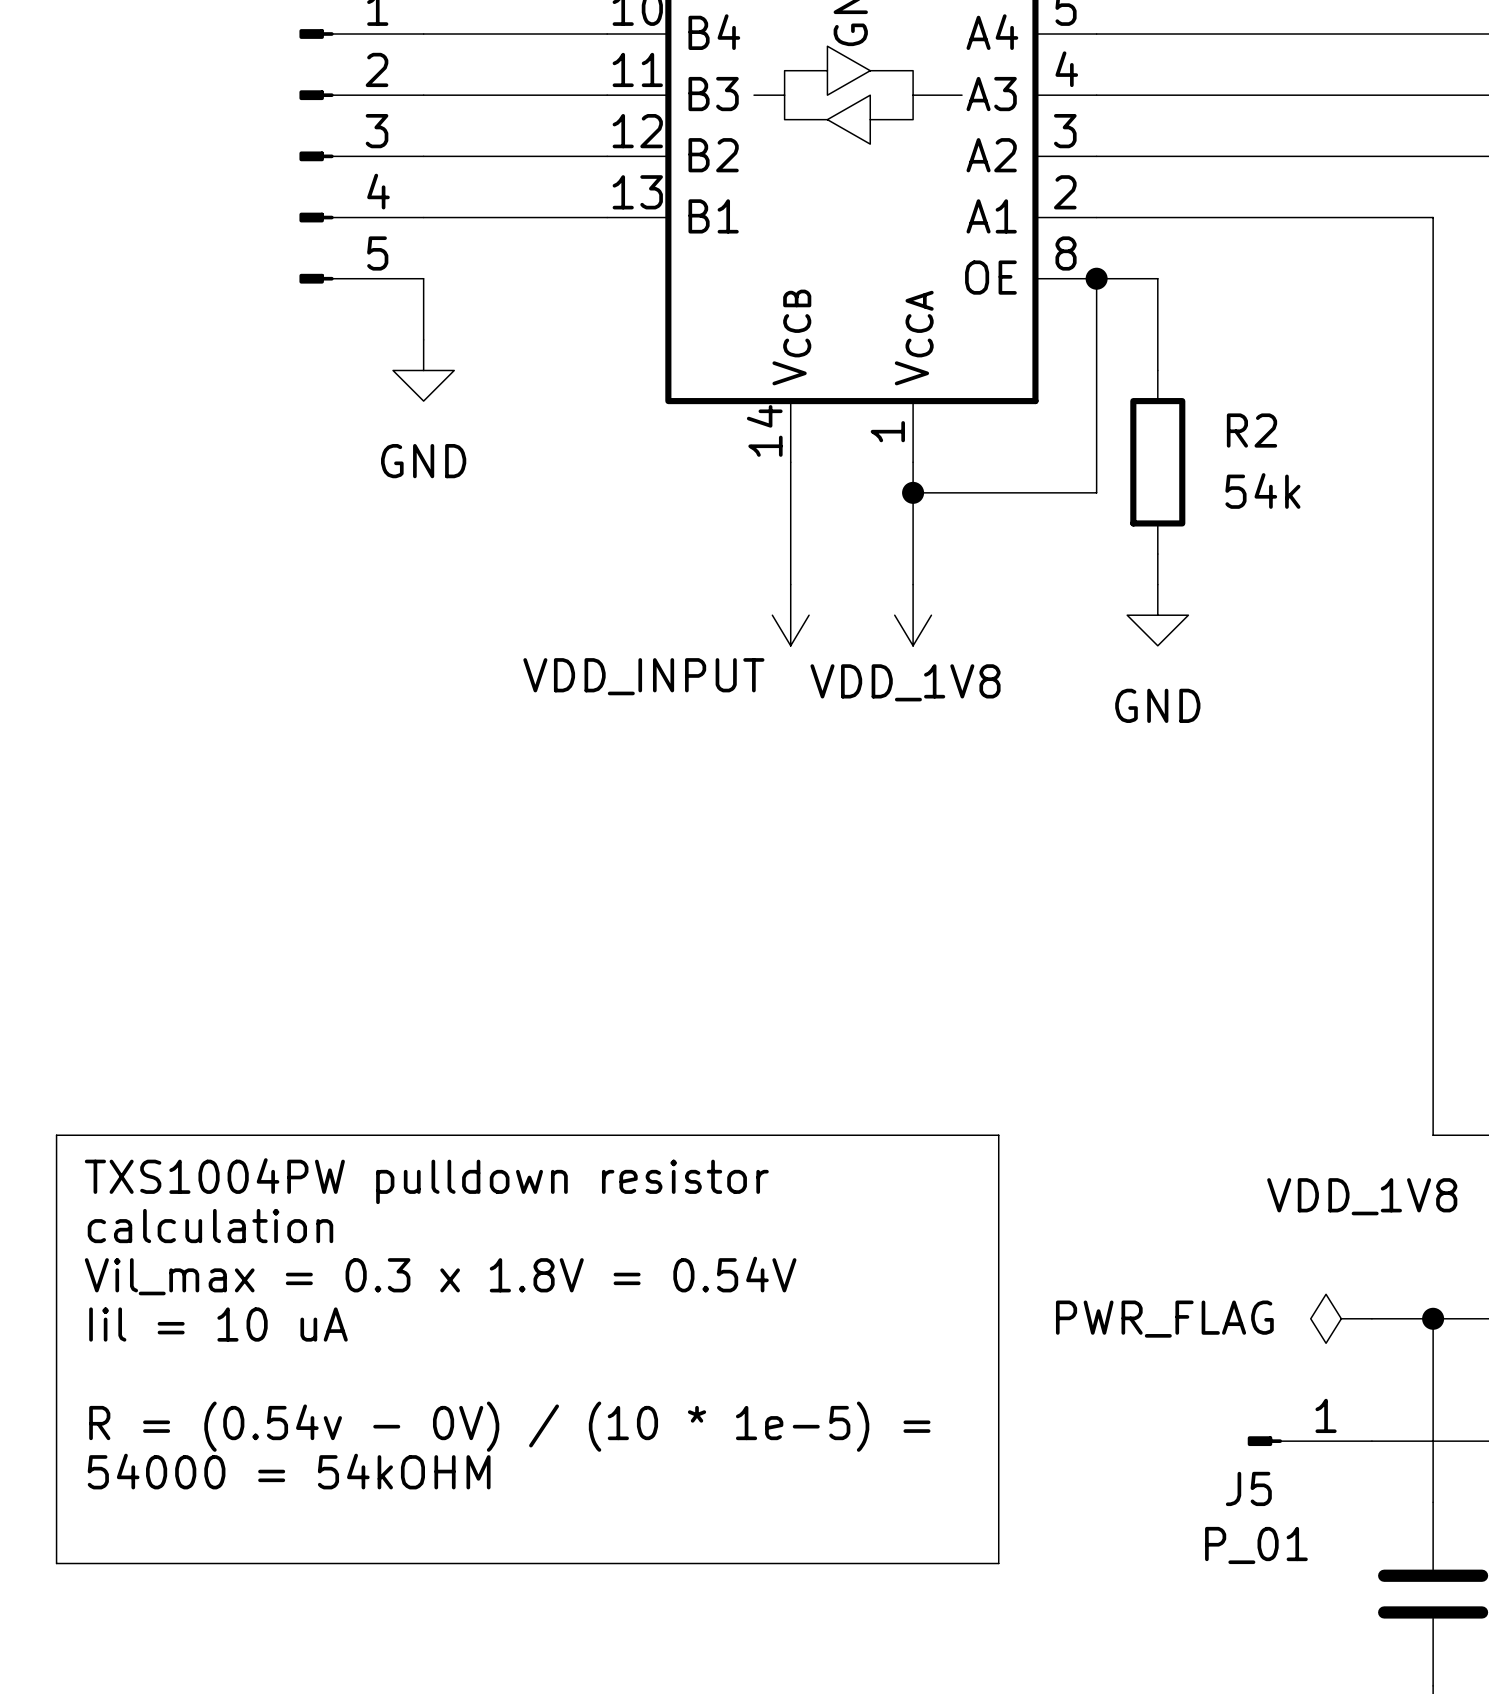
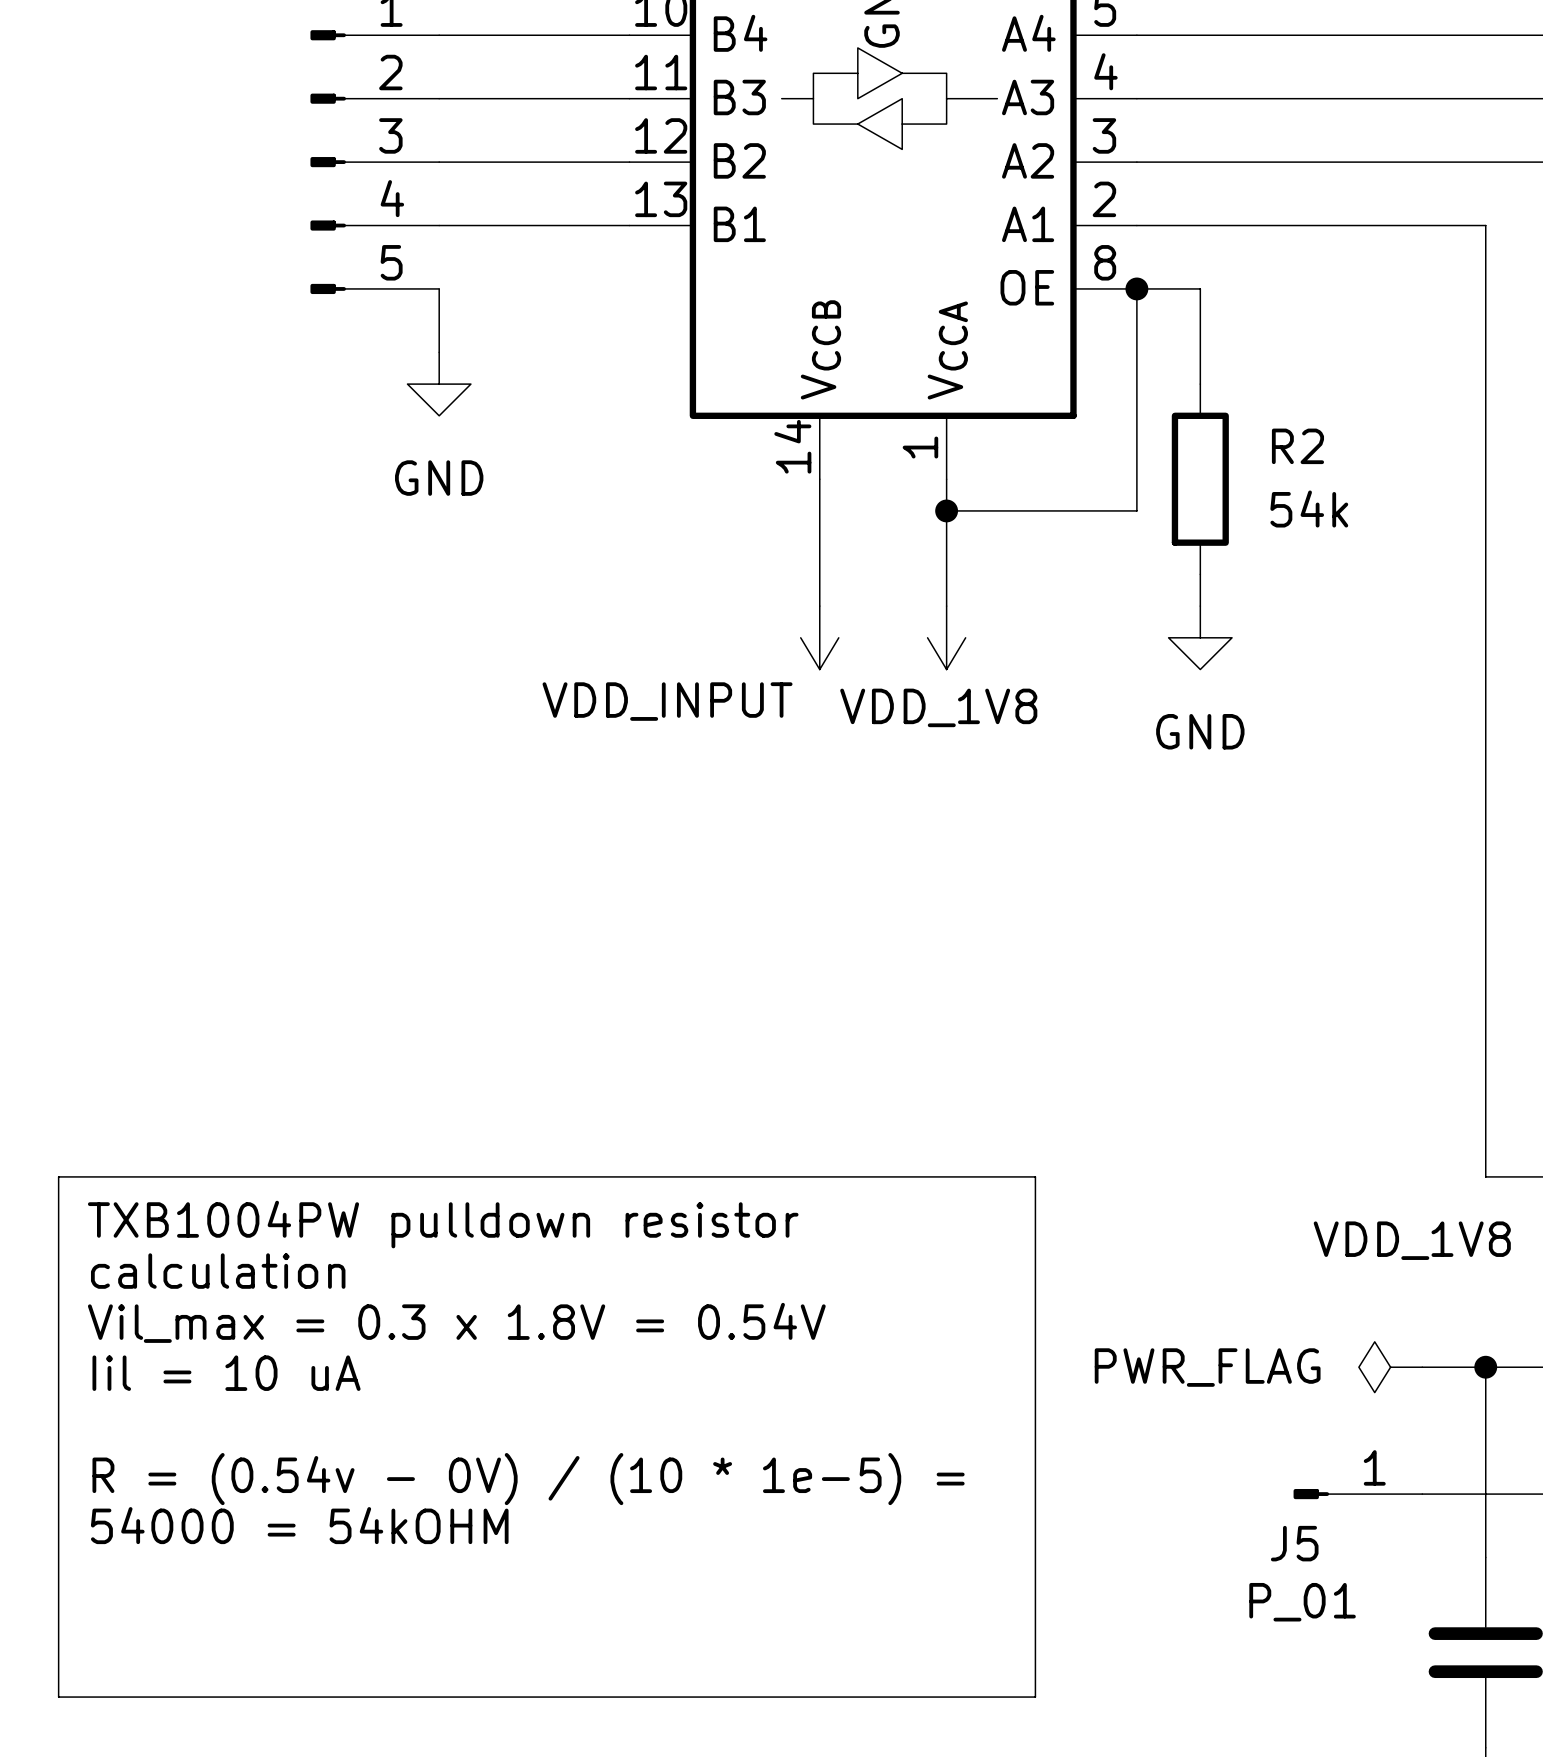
text: TXS1004PW pulldown resistor (426, 1181) -> TXB1004PW pulldown resistor (443, 1224)
line: (56, 1563) (998, 1563) -> (58, 1620) (58, 1697) (1035, 1697) (1035, 1620)

